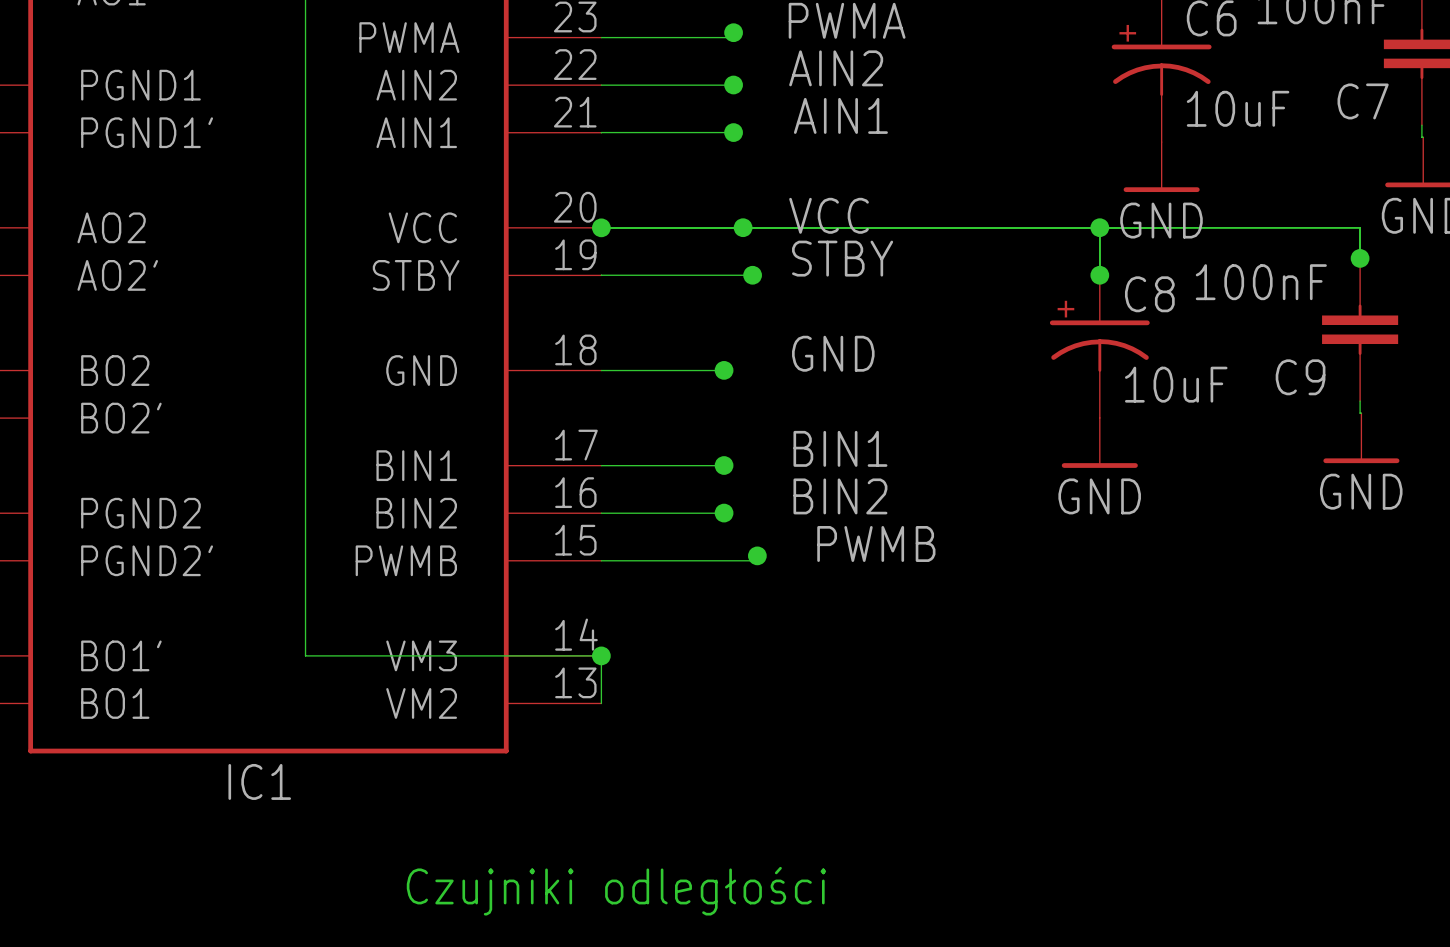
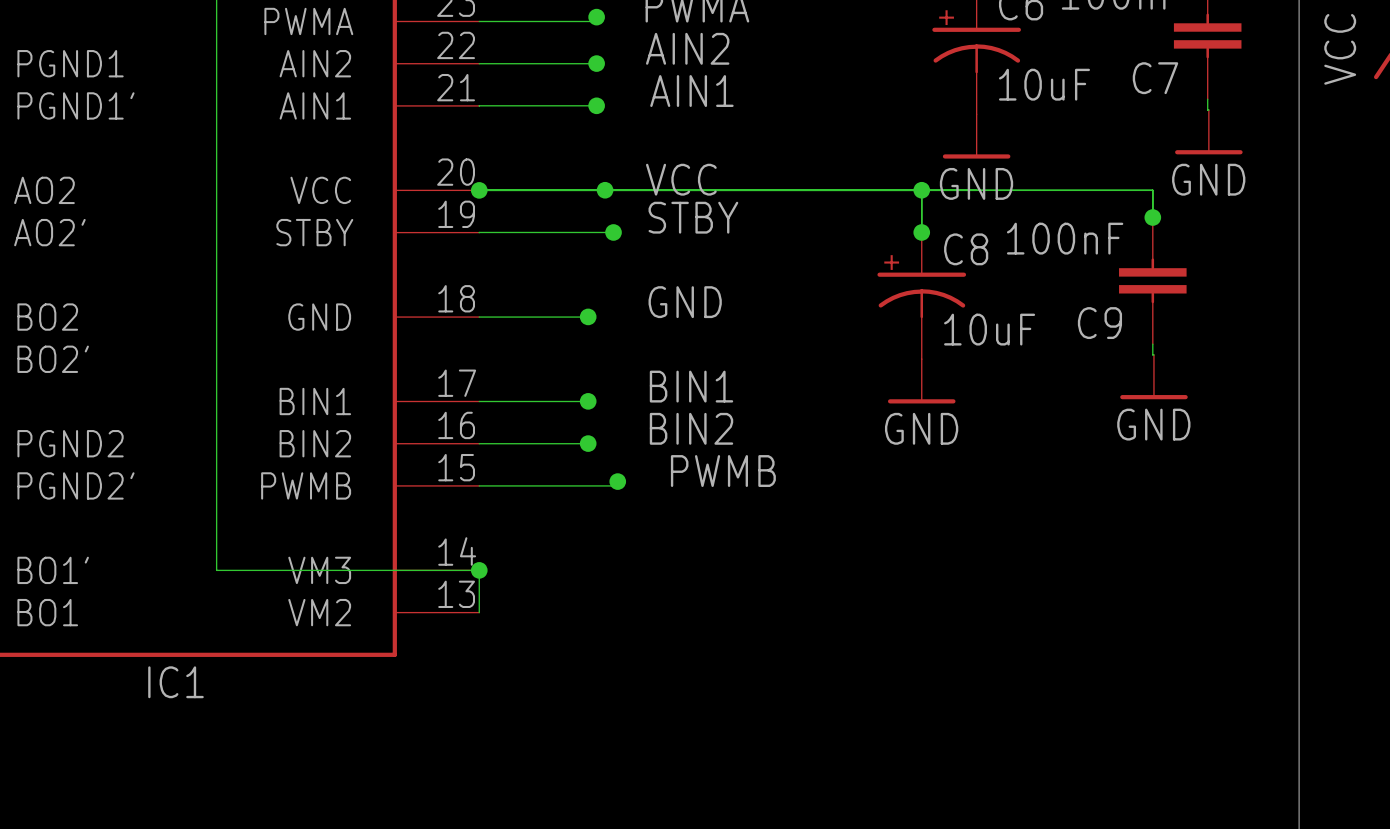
text: Czujniki odległości (616, 891) -> none

